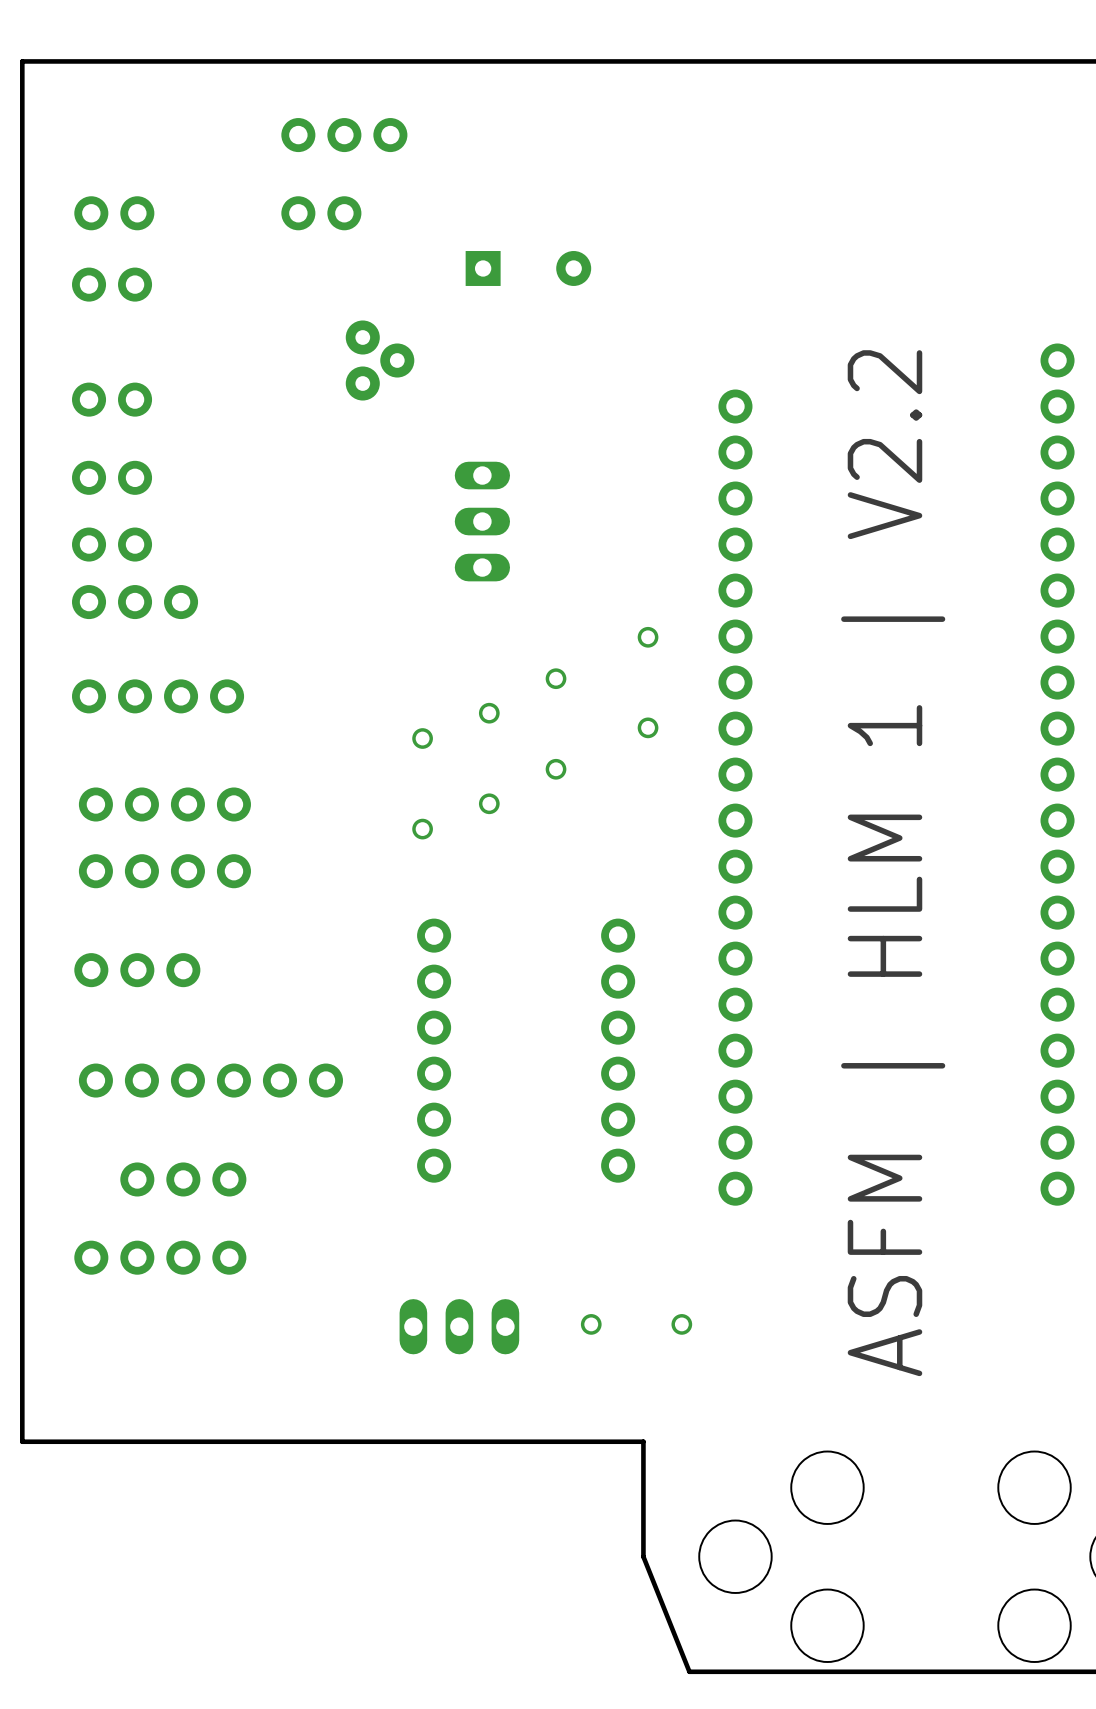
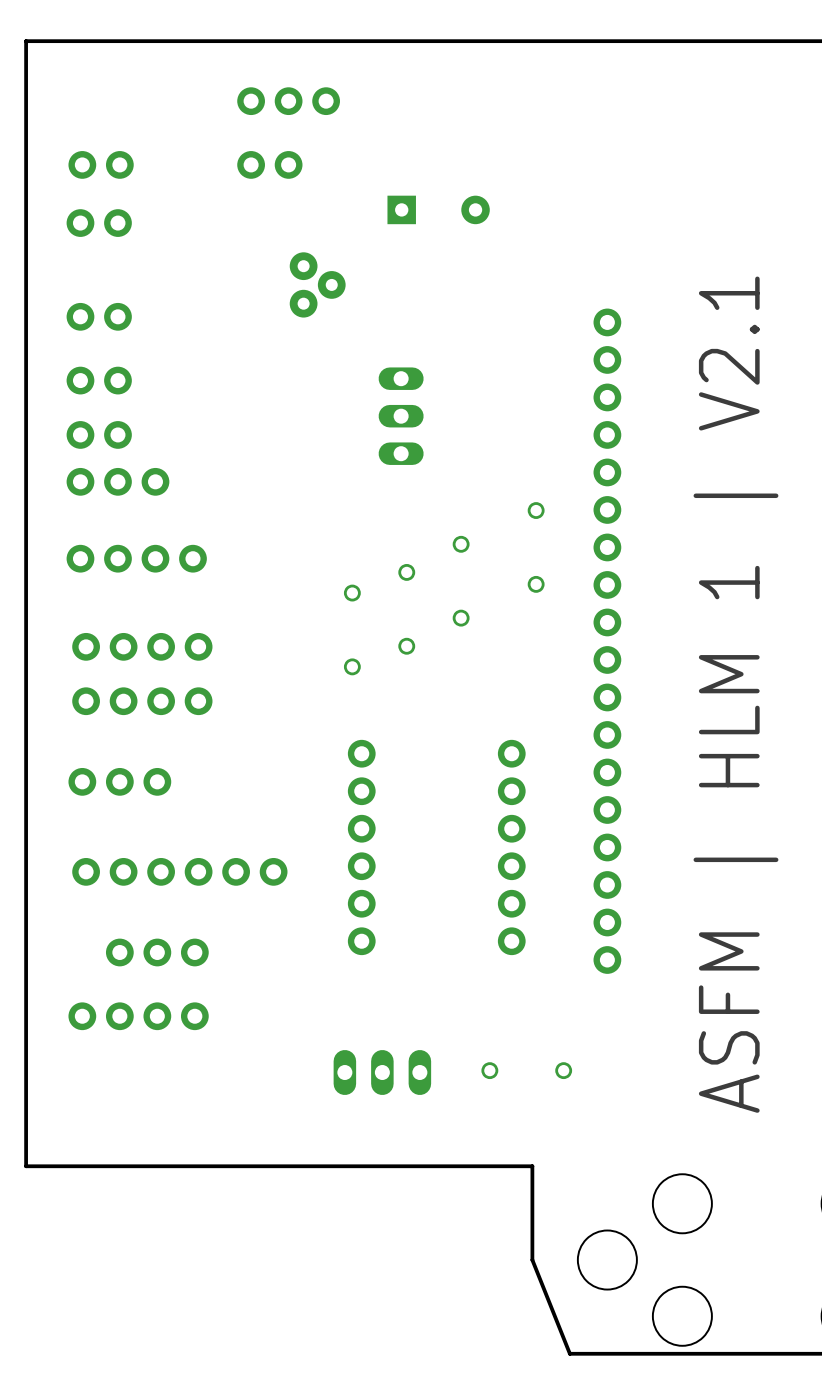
text: ASFM | HLM 1 | V2.2 (893, 863) -> ASFM | HLM 1 | V2.1 (735, 694)

